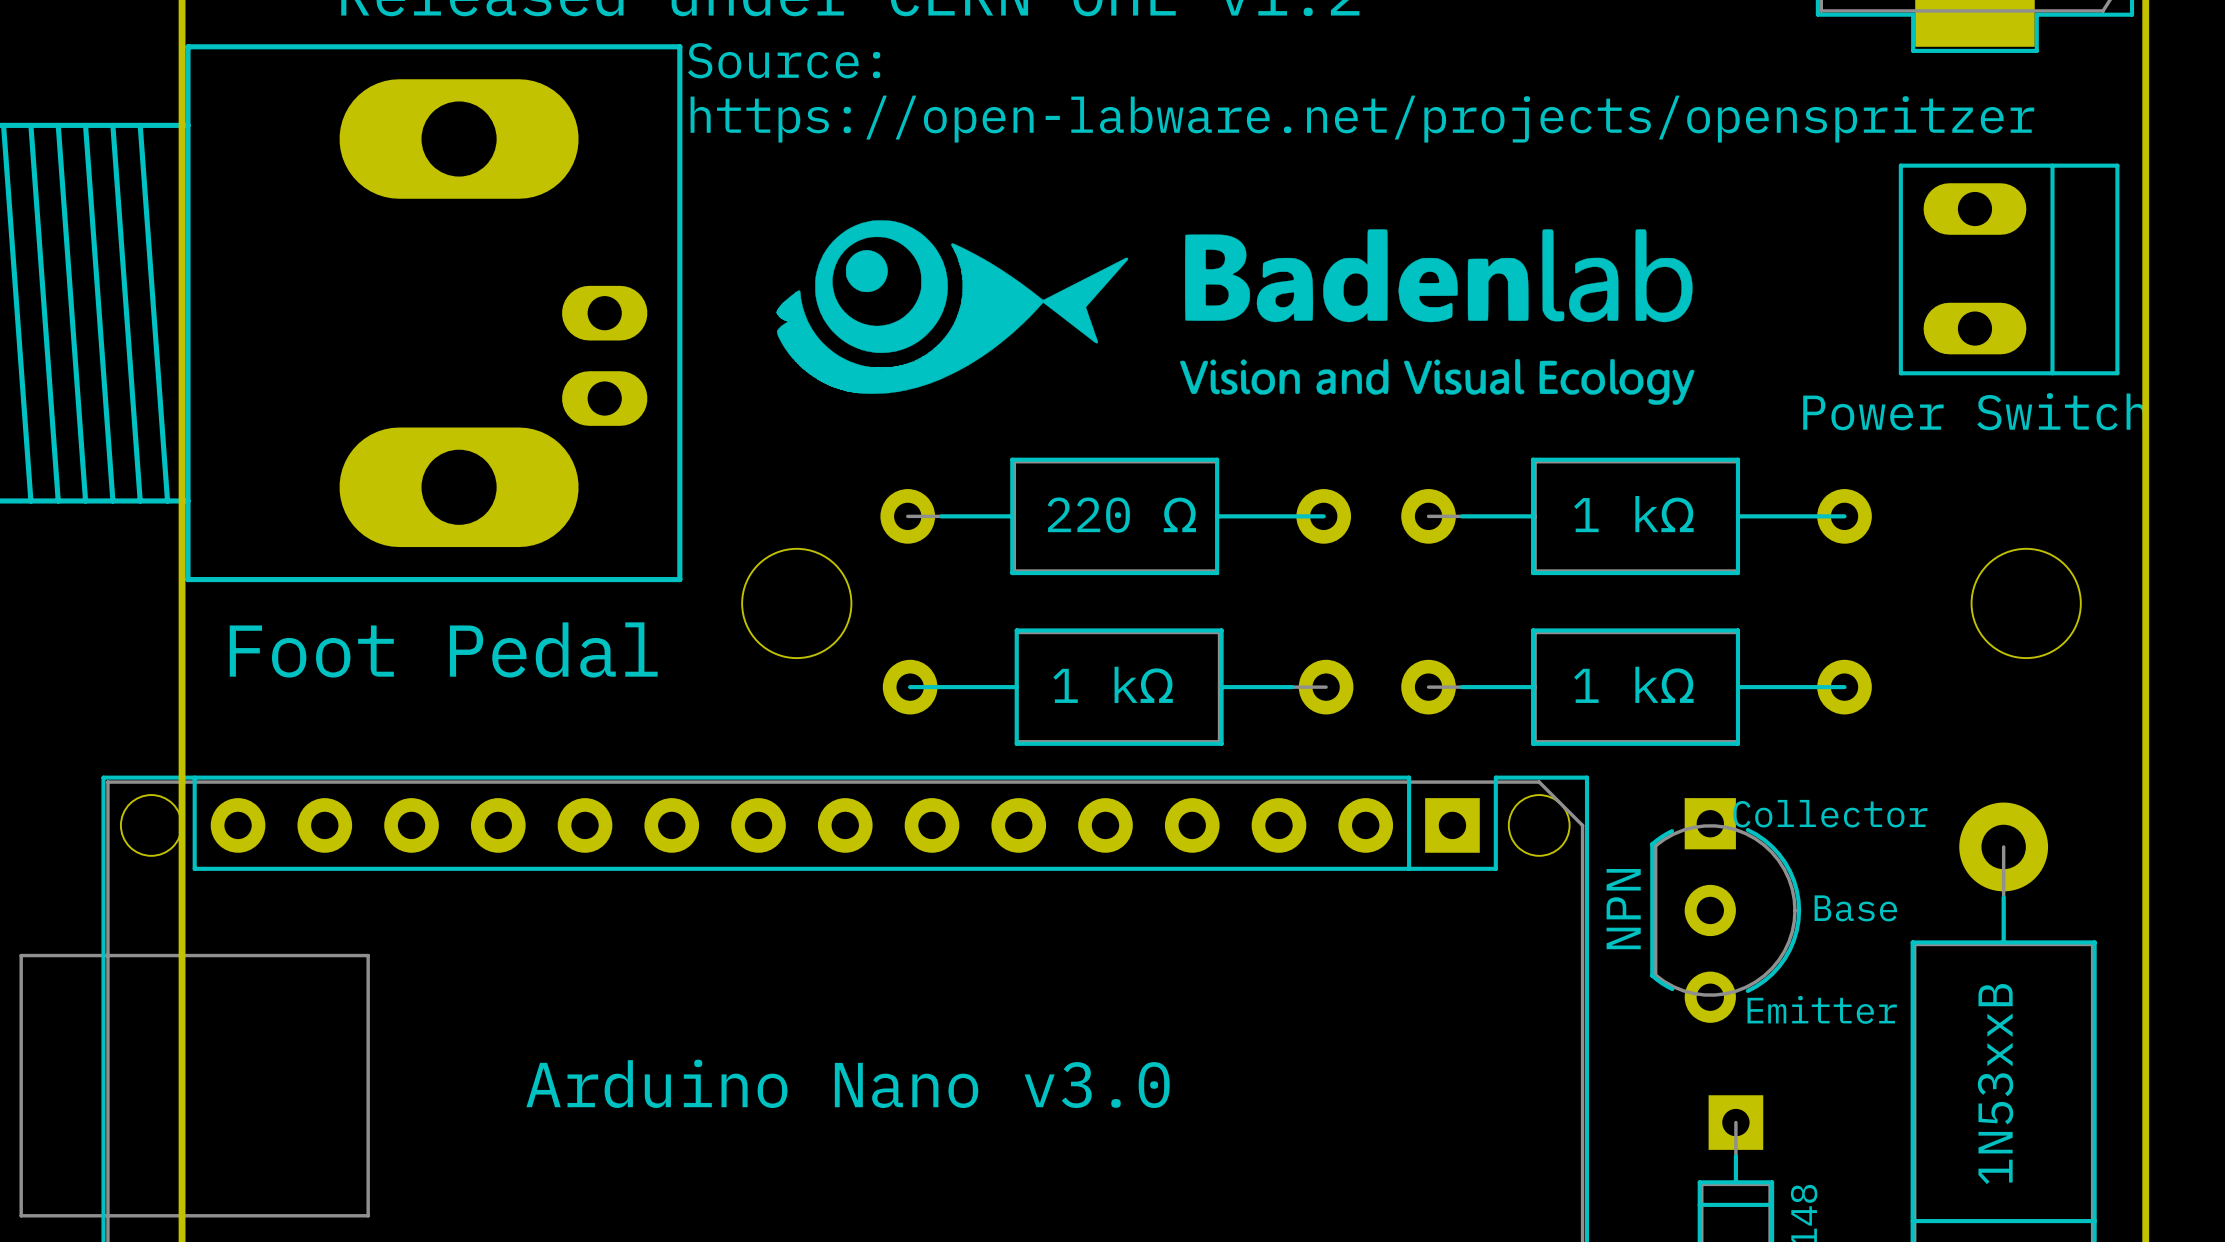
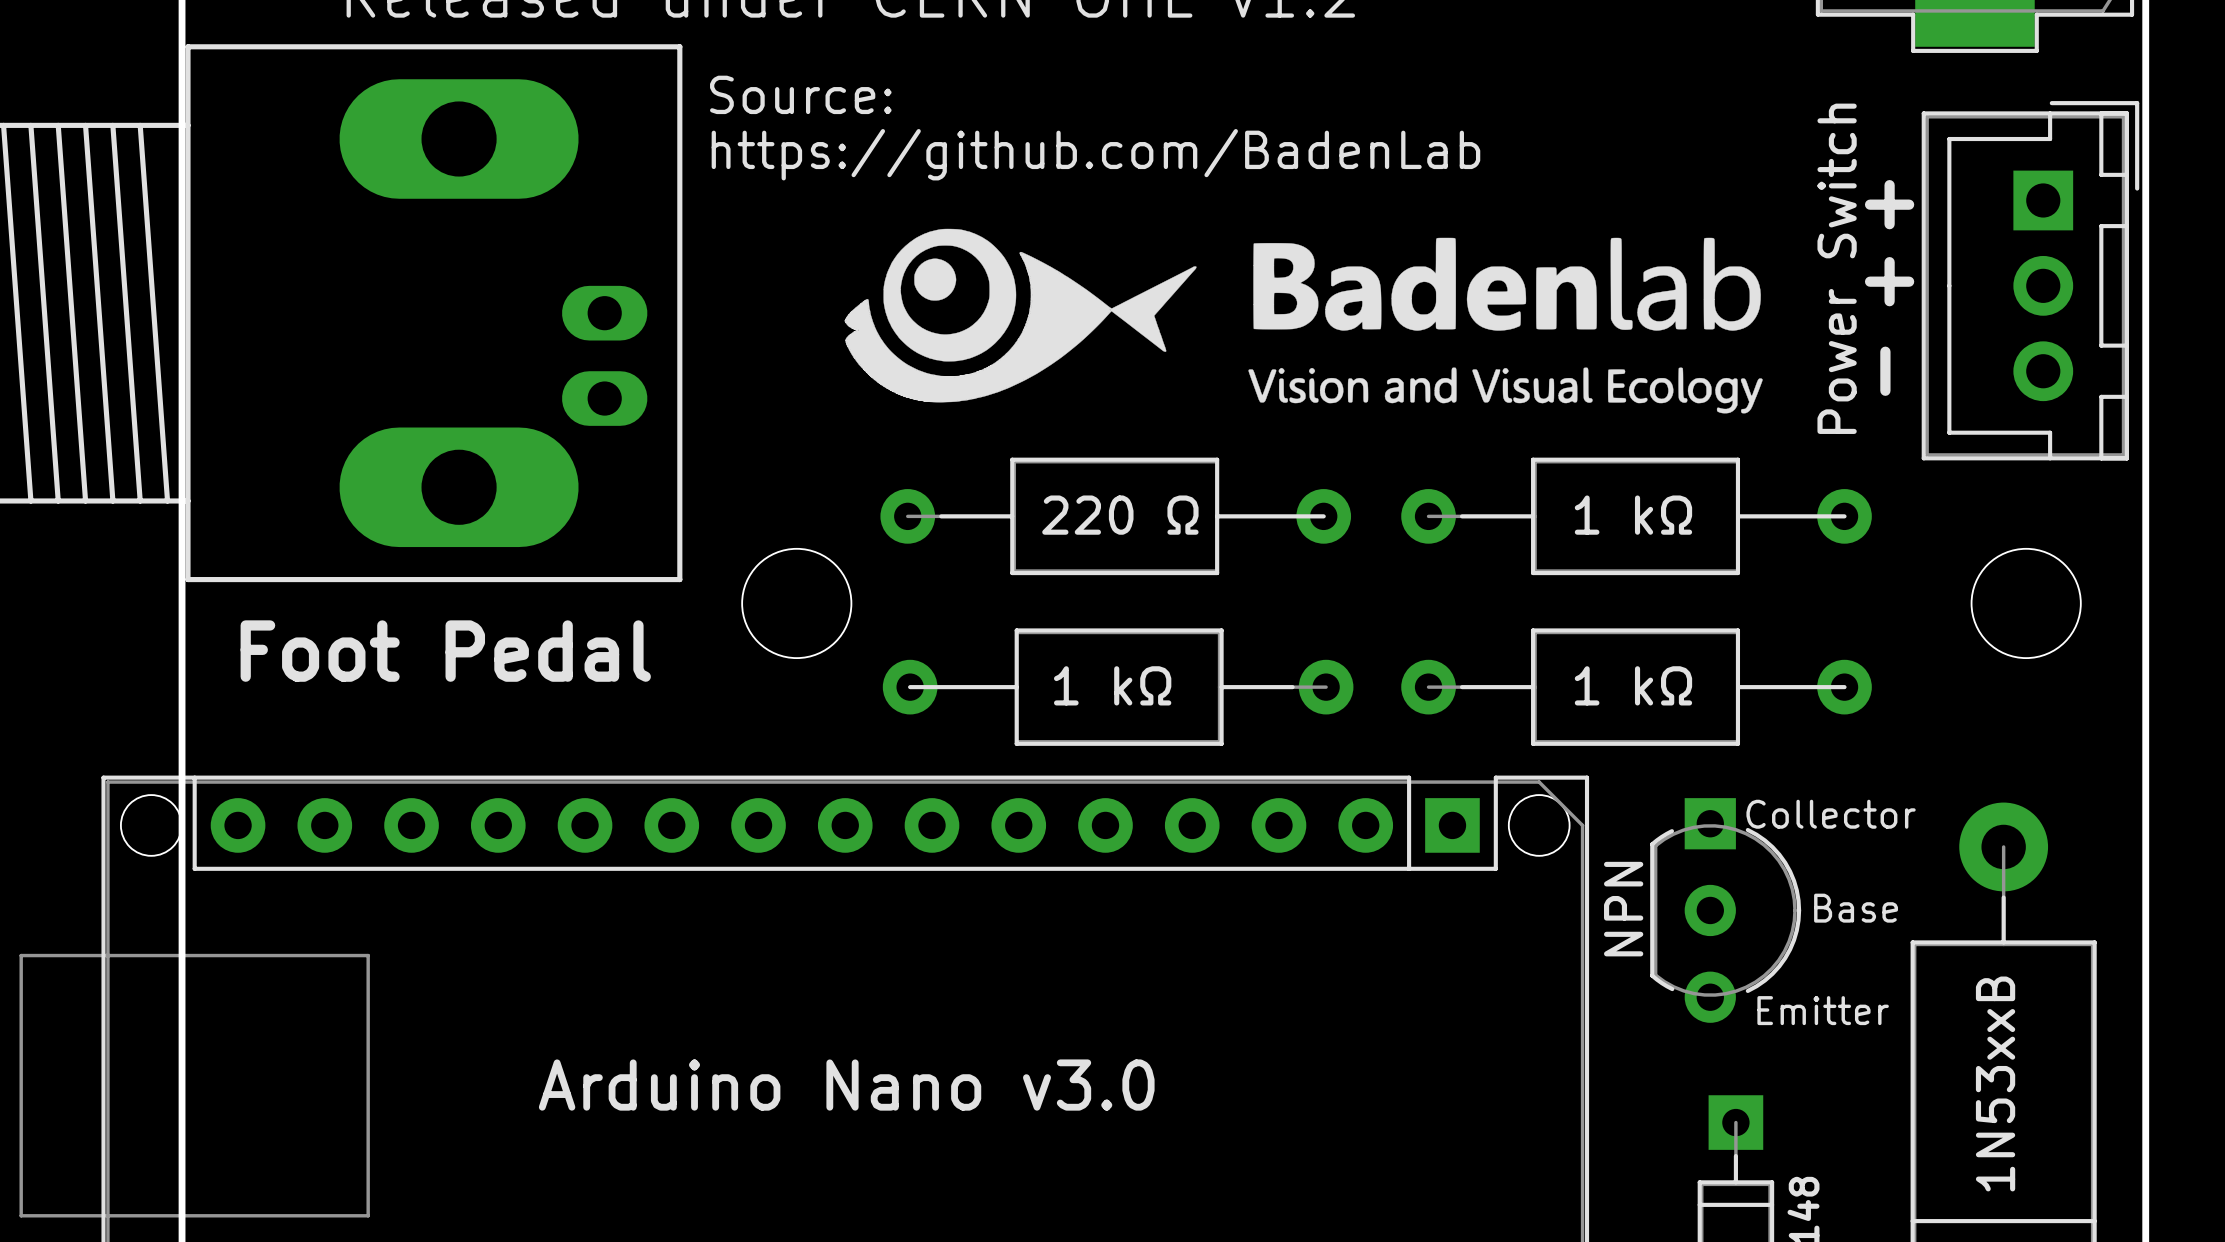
text position: Source: (784, 60) -> Source: (800, 94)
text: https://open-labware.net/projects/openspritzer (1362, 119) -> none
text: none -> https://github.com/BadenLab (1095, 154)
part footprint: [1898, 163, 2120, 376] -> [1921, 101, 2140, 461]
text: none -> + (1889, 204)
text: none -> + (1889, 281)
drawing position: (1235, 312) -> (1303, 321)
text: none -> - (1885, 371)
part value position: Power Switch (1974, 411) -> Power Switch (1837, 268)

